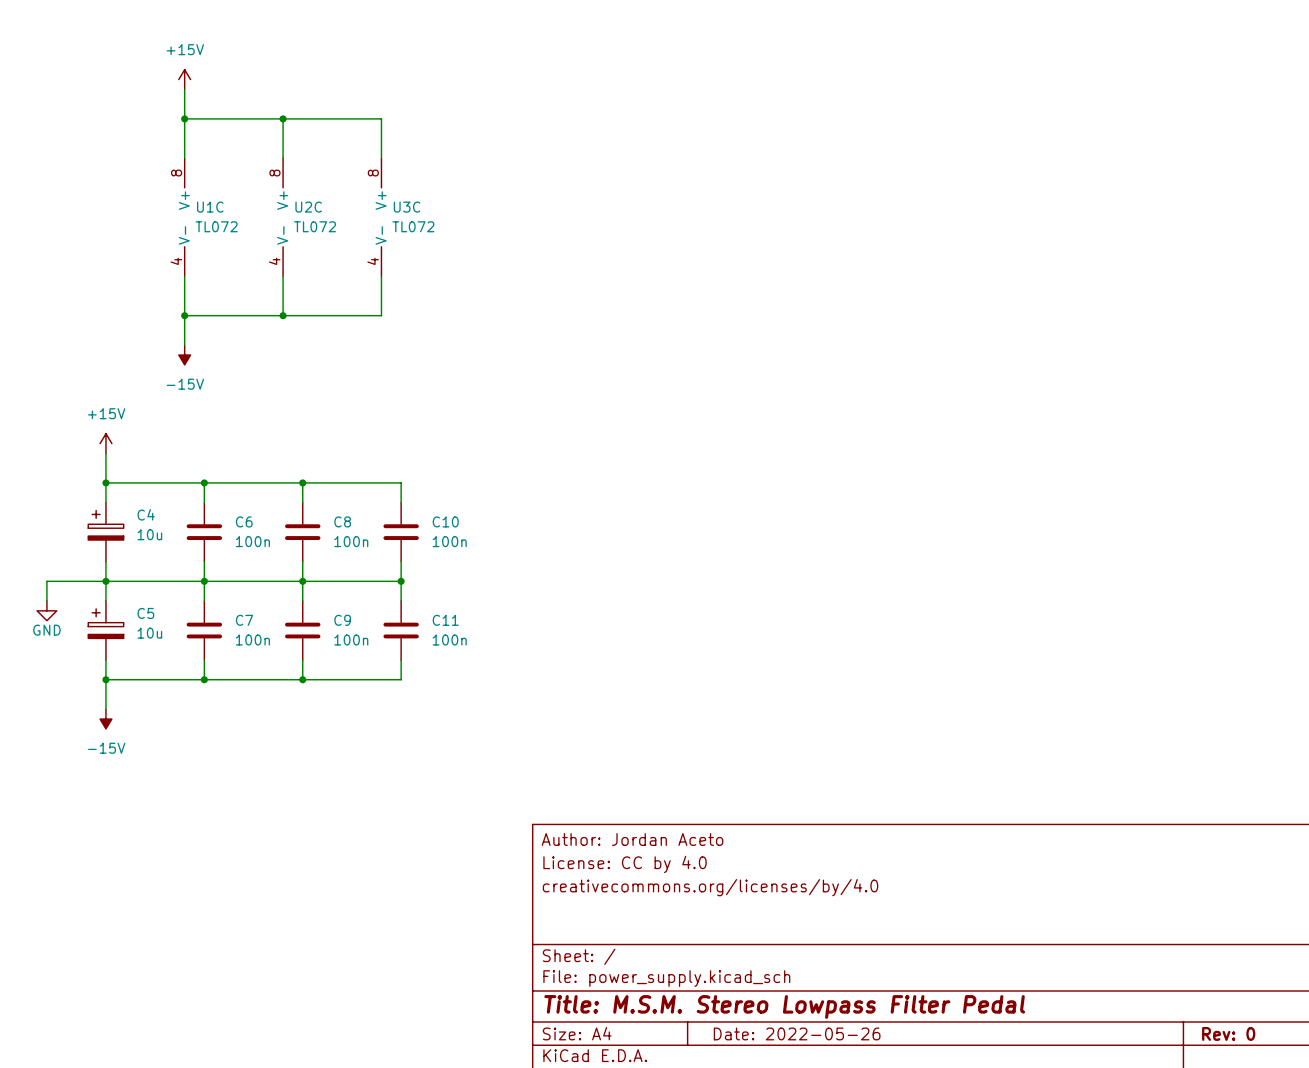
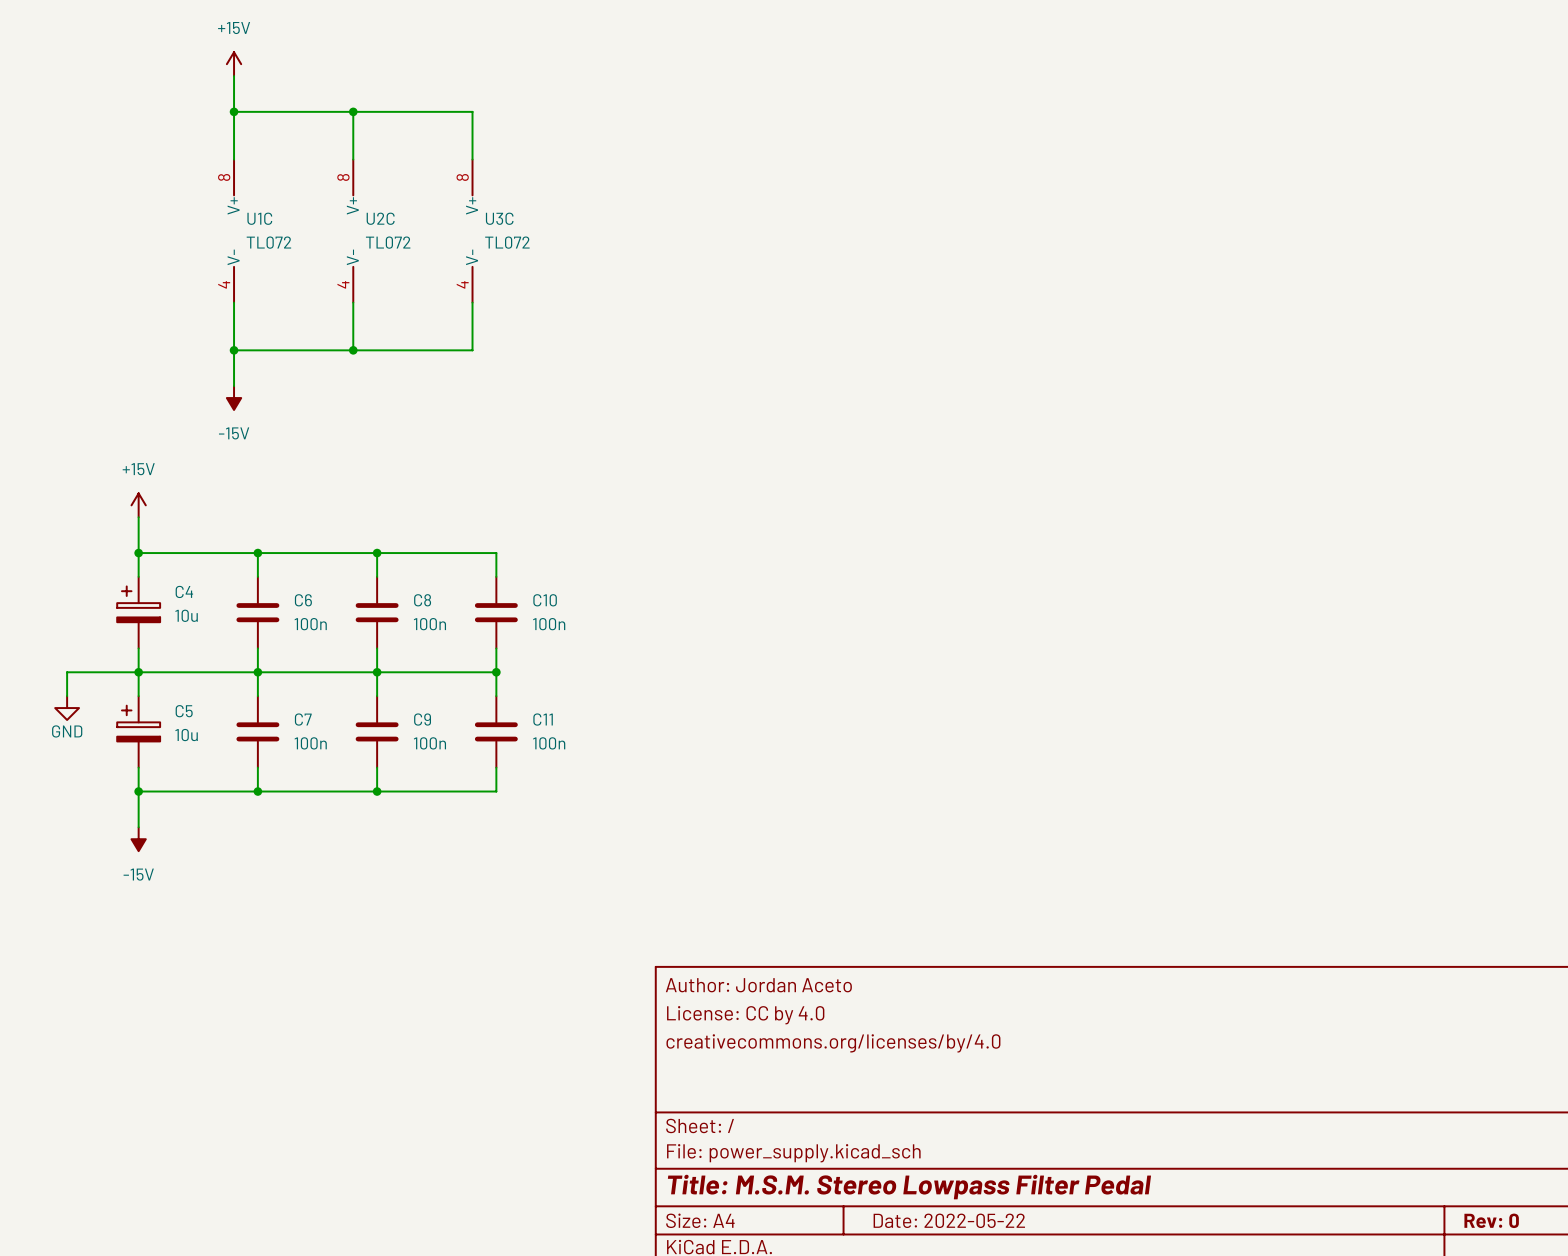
title block: Date: 2022-05-26 (797, 1033) -> Date: 2022-05-22 (949, 1220)

